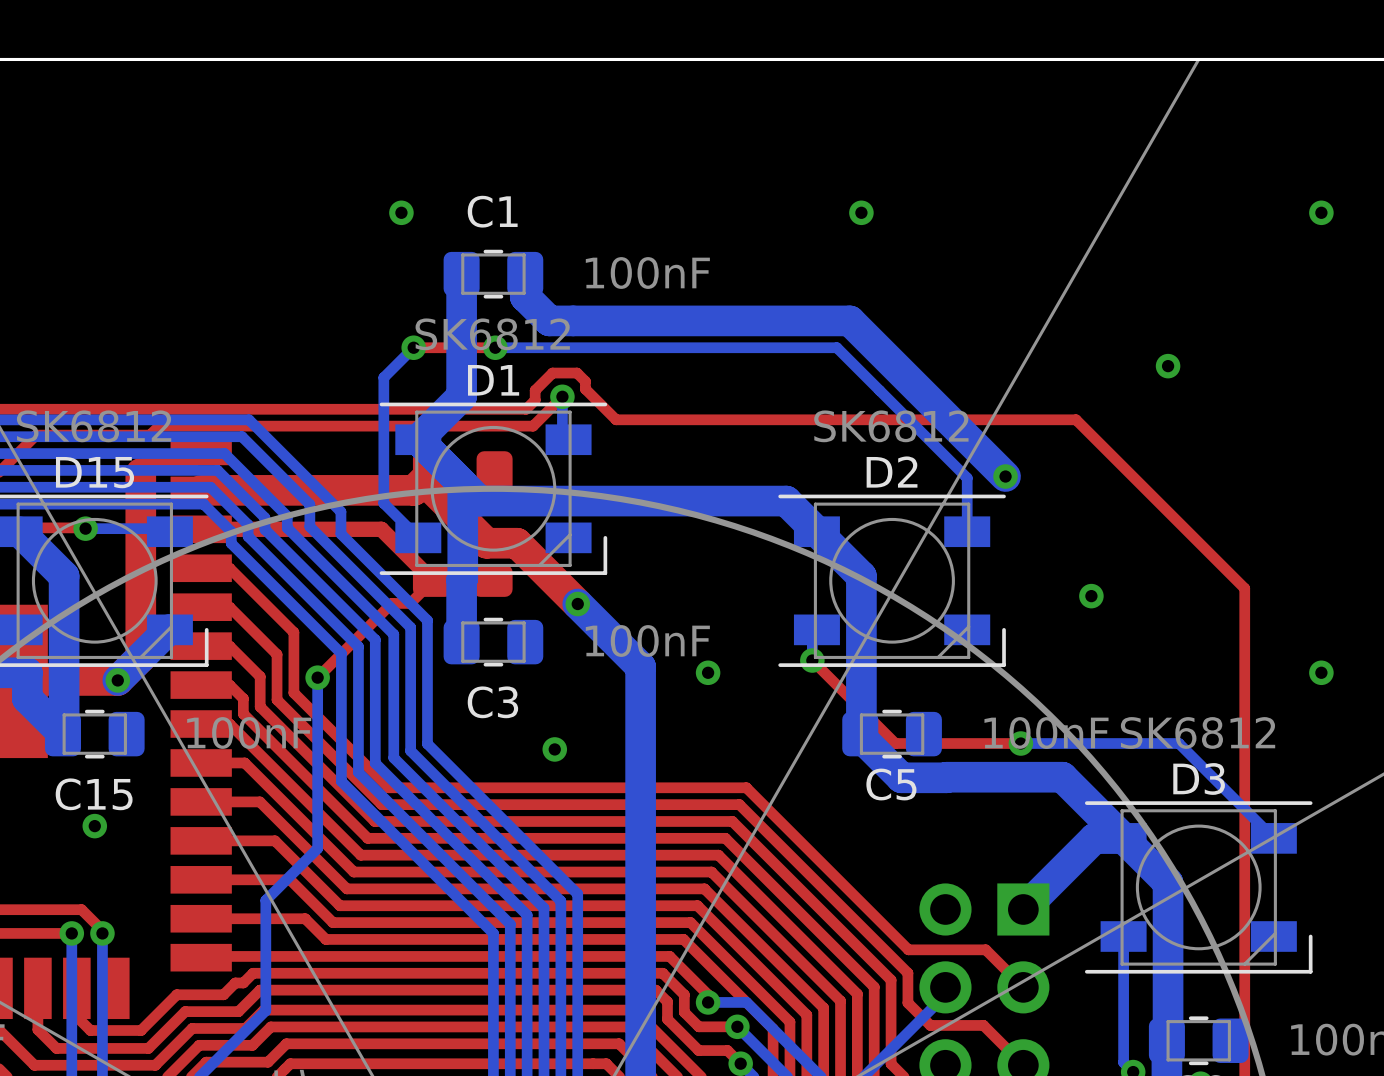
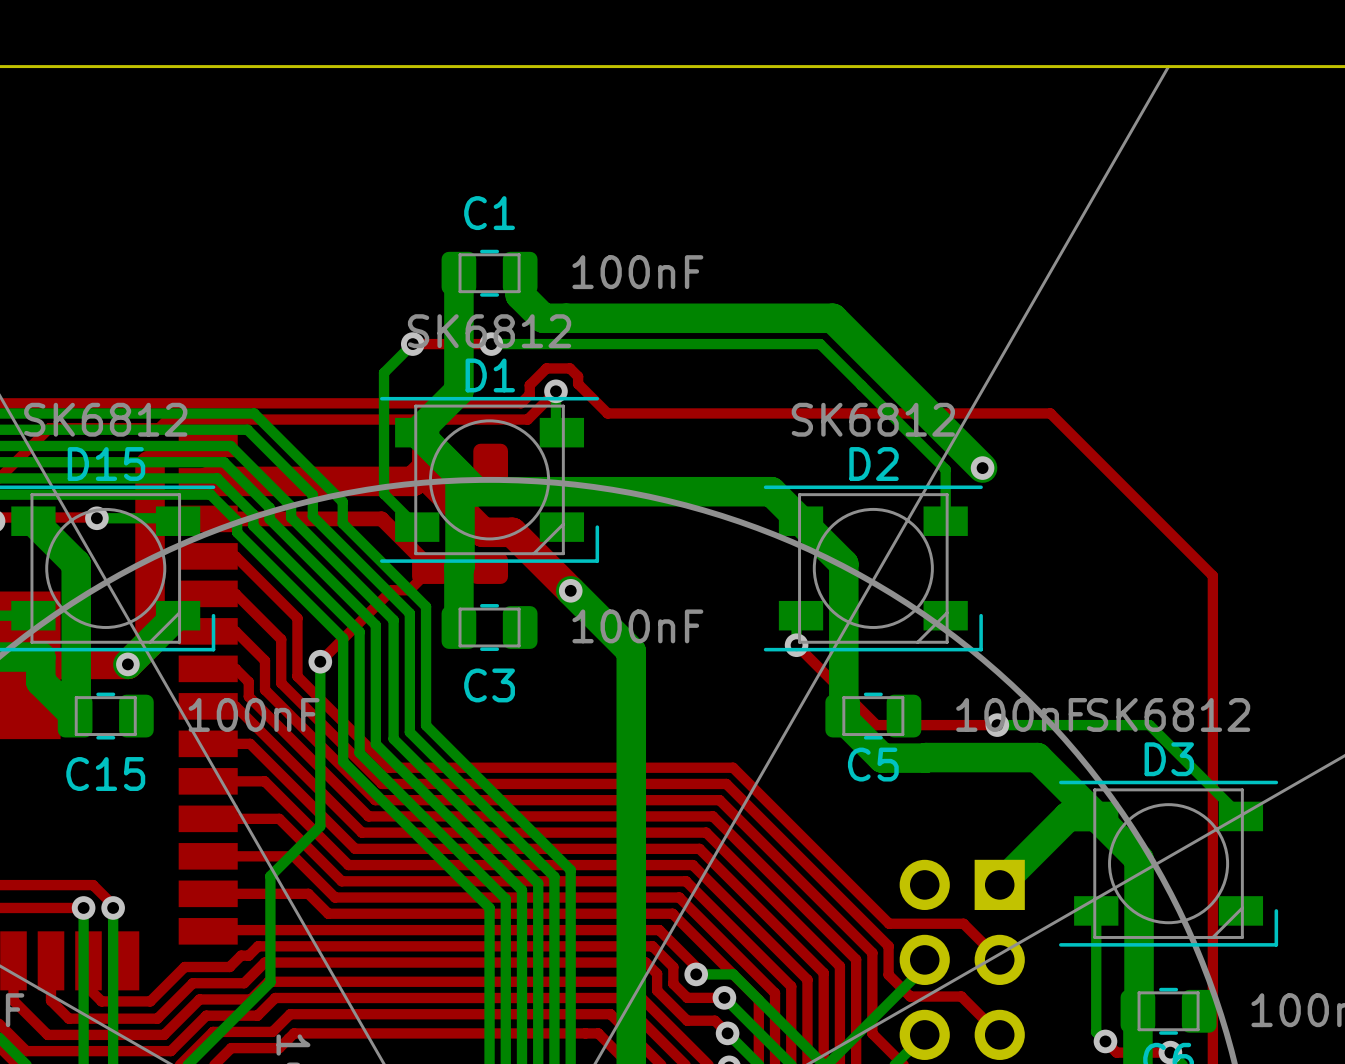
via: (401, 212) -> none
via: (861, 212) -> none
via: (1321, 212) -> none
via: (1168, 366) -> none
via: (1091, 596) -> none
via: (708, 672) -> none
via: (1321, 672) -> none
via: (554, 749) -> none
via: (94, 826) -> none

